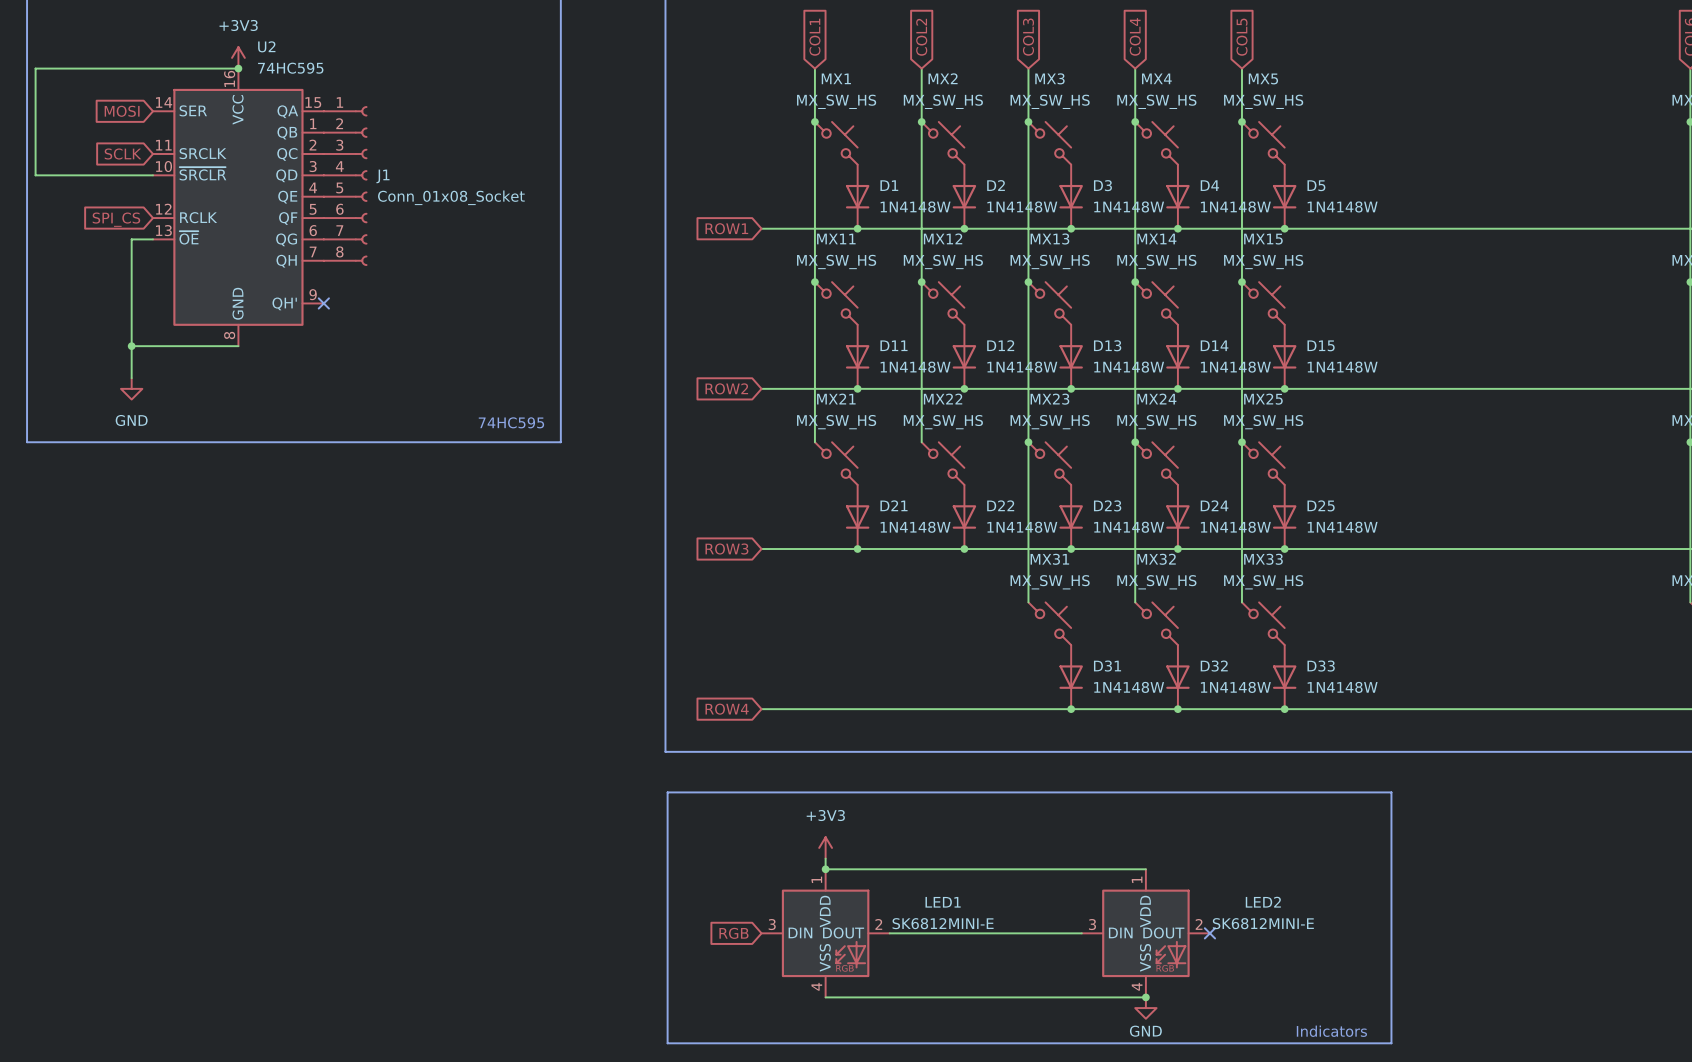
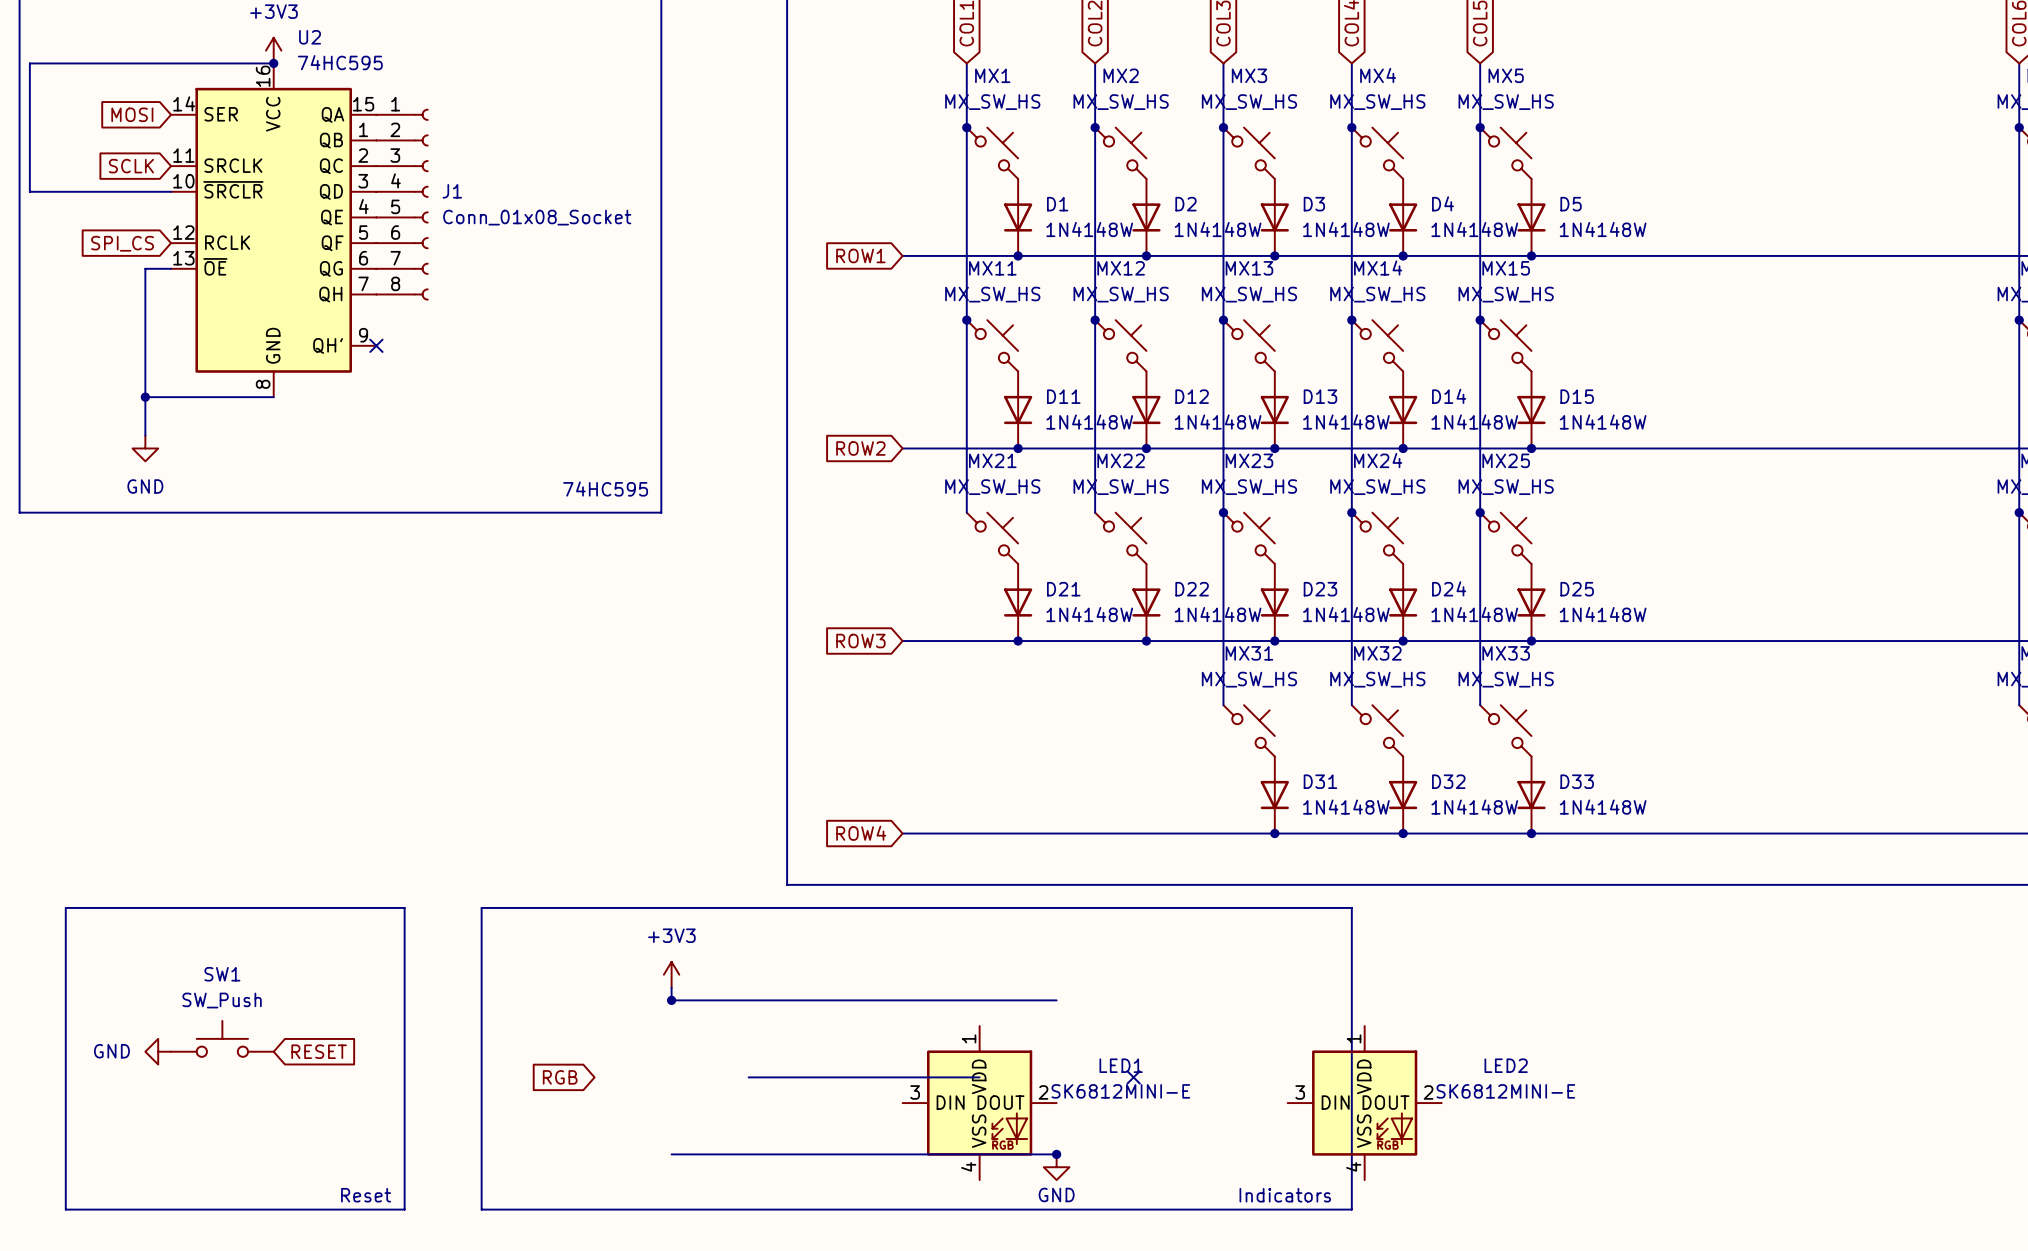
line: none -> (65, 907) (404, 907) (404, 1209) (65, 1209) (65, 907)
line: none -> (481, 907) (1351, 907) (1351, 1209) (481, 1209) (481, 907)
line: (667, 792) (1391, 792) (1391, 1043) (667, 1043) (667, 792) -> none
power symbol: none -> +3V3 (671, 974)
wire: none -> (671, 987) (671, 1000) (1056, 1000)
junction: none -> (671, 1000)
power symbol: +3V3 (825, 847) -> none
wire: (825, 858) (825, 869) (1145, 869) -> none
junction: (825, 869) -> none
SW1: none -> SW_Push (222, 1038)
power symbol: none -> GND (158, 1051)
global label: none -> RESET (319, 1051)
wire: none -> (748, 1077) (979, 1077)
no-connect mark: none -> (1133, 1077)
global label: none -> RGB (560, 1077)
global label: RGB (733, 933) -> none
wire: (889, 933) (1081, 933) -> none
no-connect mark: (1209, 933) -> none
wire: none -> (671, 1154) (1056, 1154)
junction: none -> (1056, 1154)
power symbol: none -> GND (1056, 1167)
wire: (825, 997) (1145, 997) -> none
junction: (1145, 997) -> none
power symbol: GND (1145, 1008) -> none
text: none -> Indicators (1285, 1195)
text: none -> Reset (366, 1195)
text: Indicators (1331, 1031) -> none

